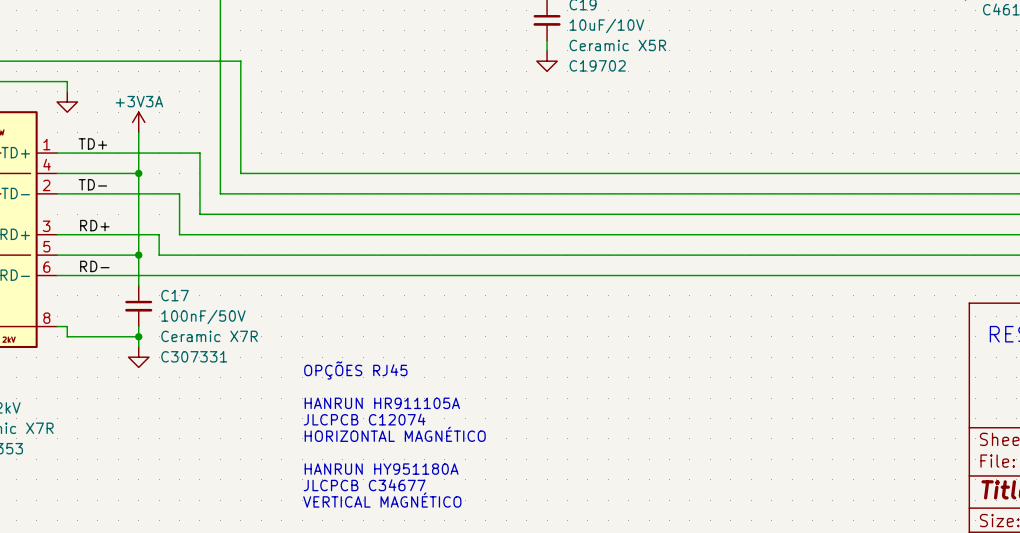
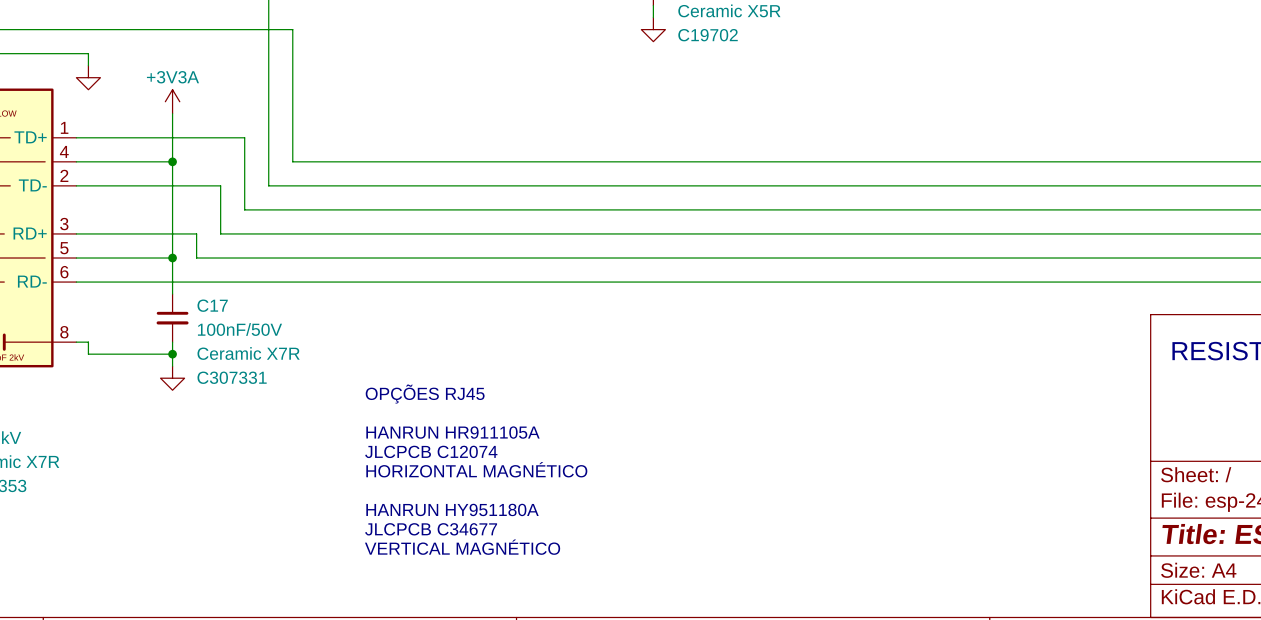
label: TD+ (92, 143) -> none
label: TD- (92, 184) -> none
label: RD+ (94, 225) -> none
label: RD- (94, 266) -> none

